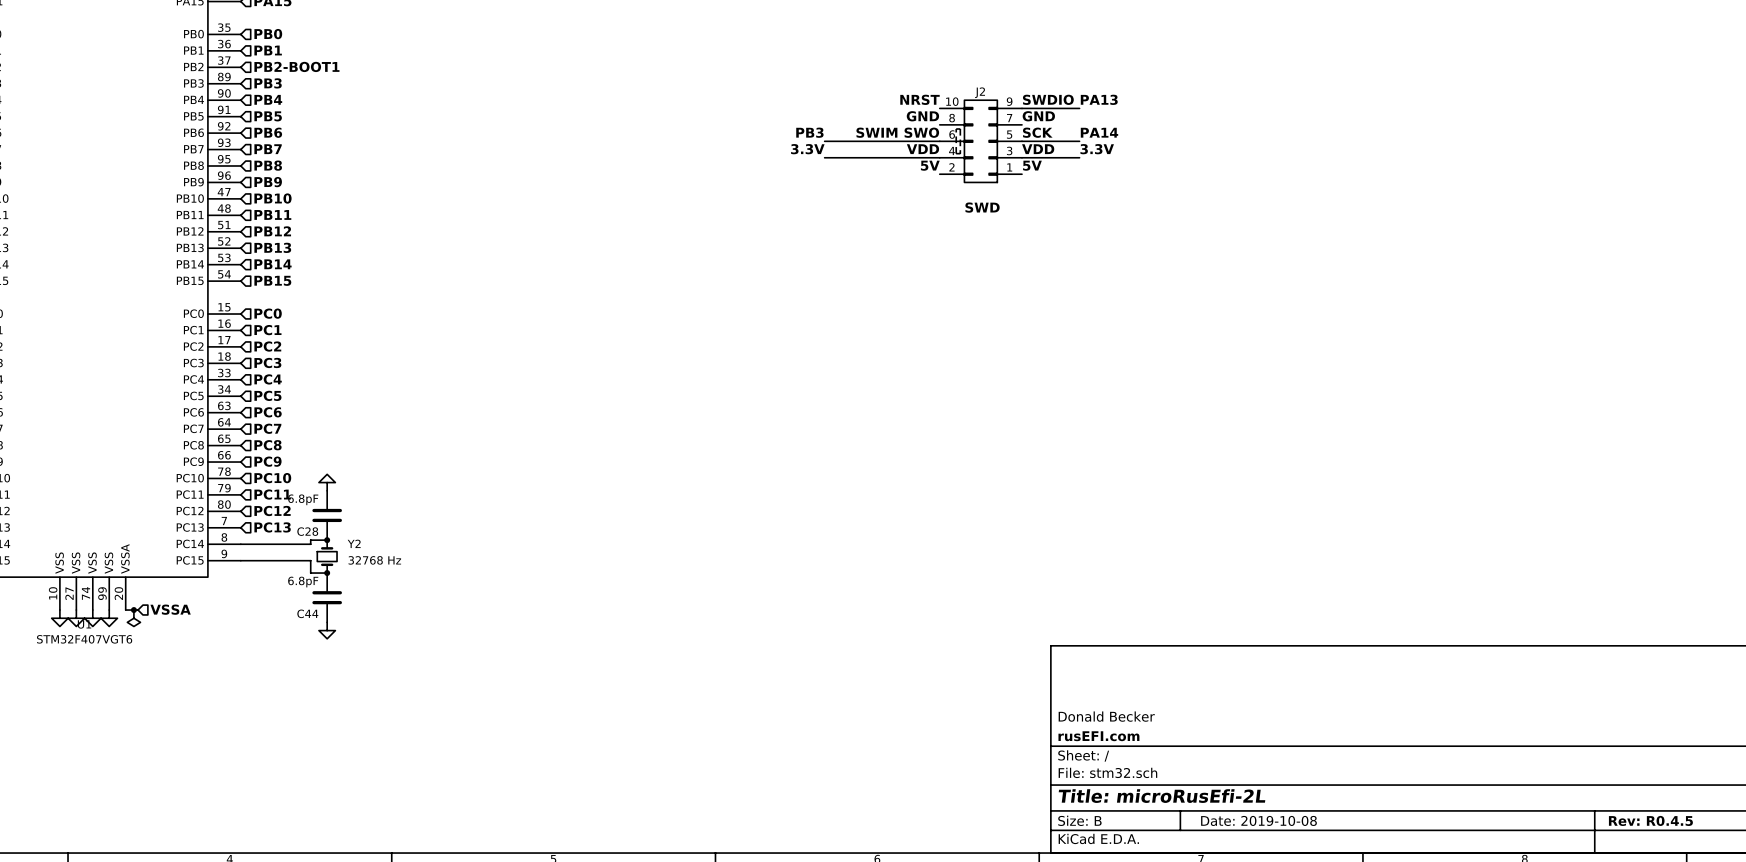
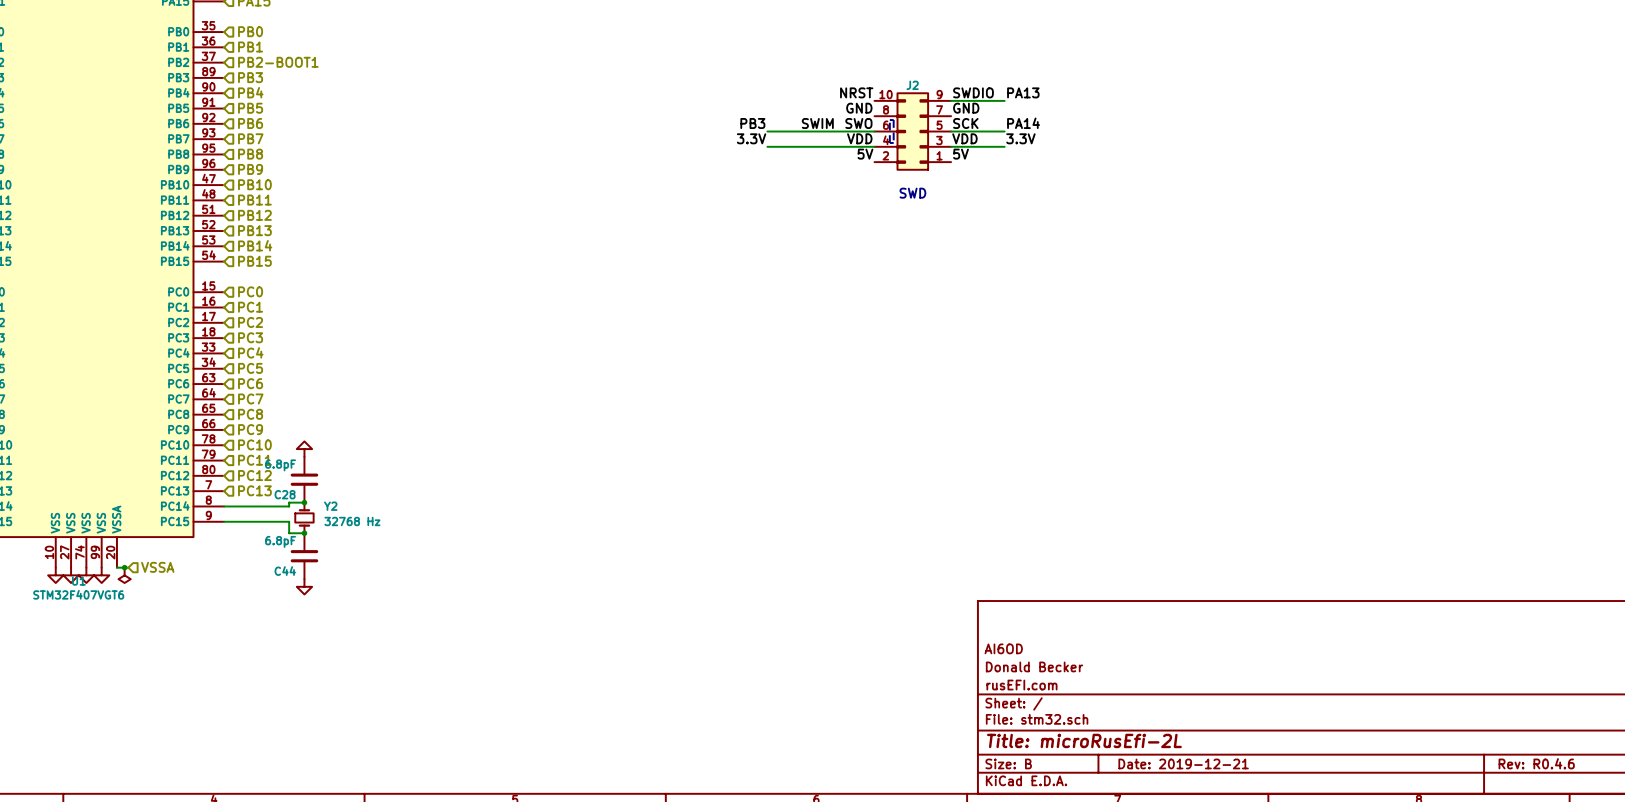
title block: none -> AI6OD (1003, 648)
title block: Date: 2019-10-08 (1258, 820) -> Date: 2019-12-21 (1183, 763)
title block: Rev: R0.4.5 (1650, 820) -> Rev: R0.4.6 (1536, 763)

